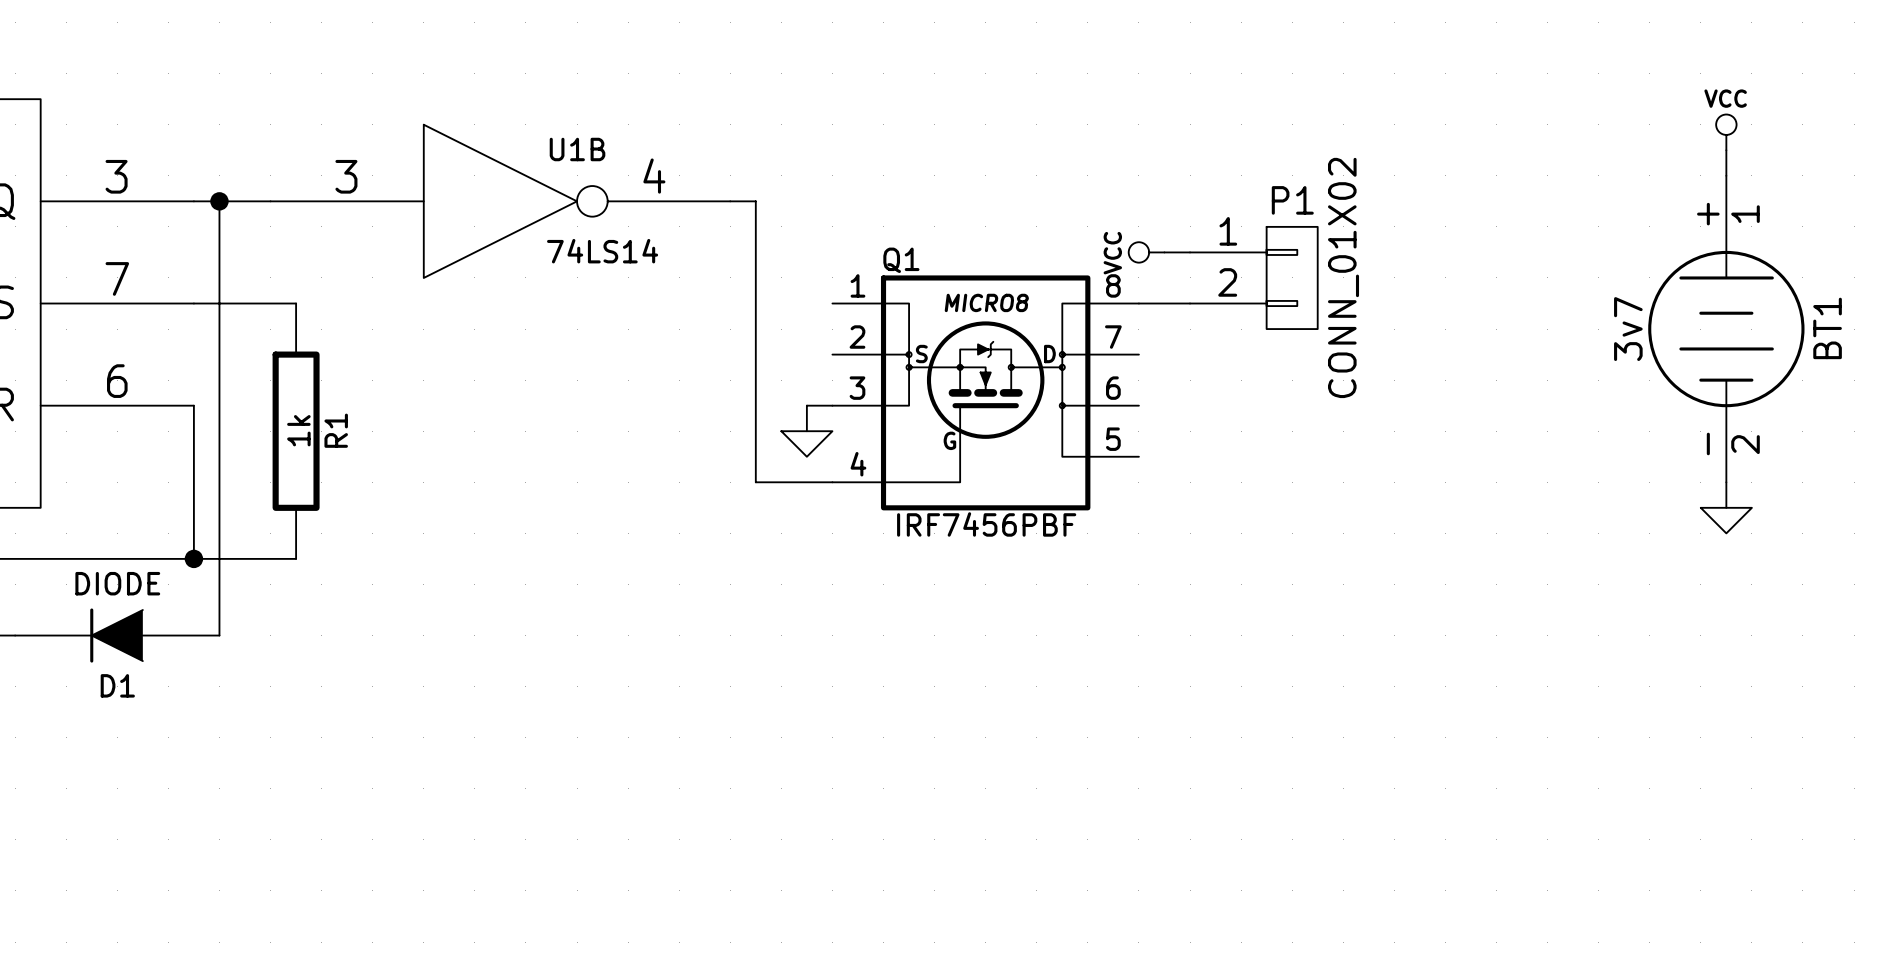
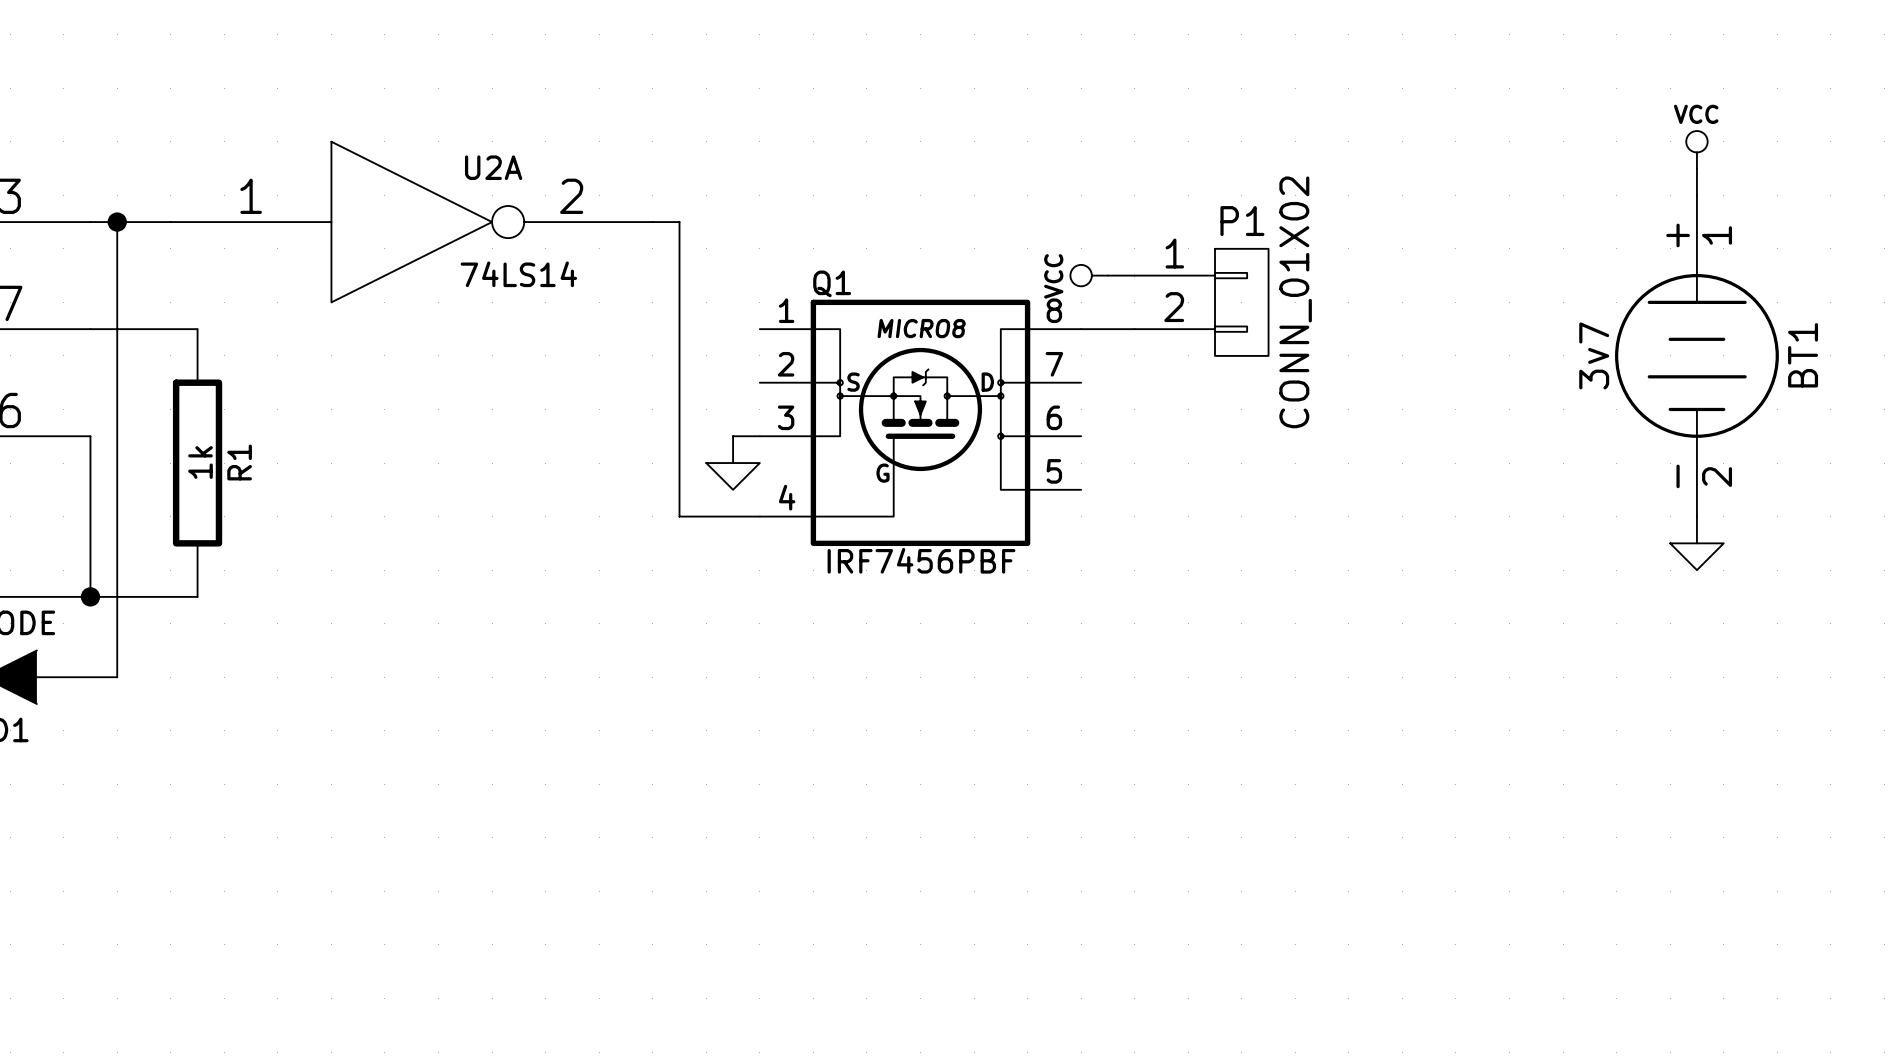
U1B name: U1B (577, 149) -> U2A (493, 167)
U1B pin number: 3 (346, 176) -> 1 (251, 196)
U1B pin number: 4 (654, 176) -> 2 (571, 196)

